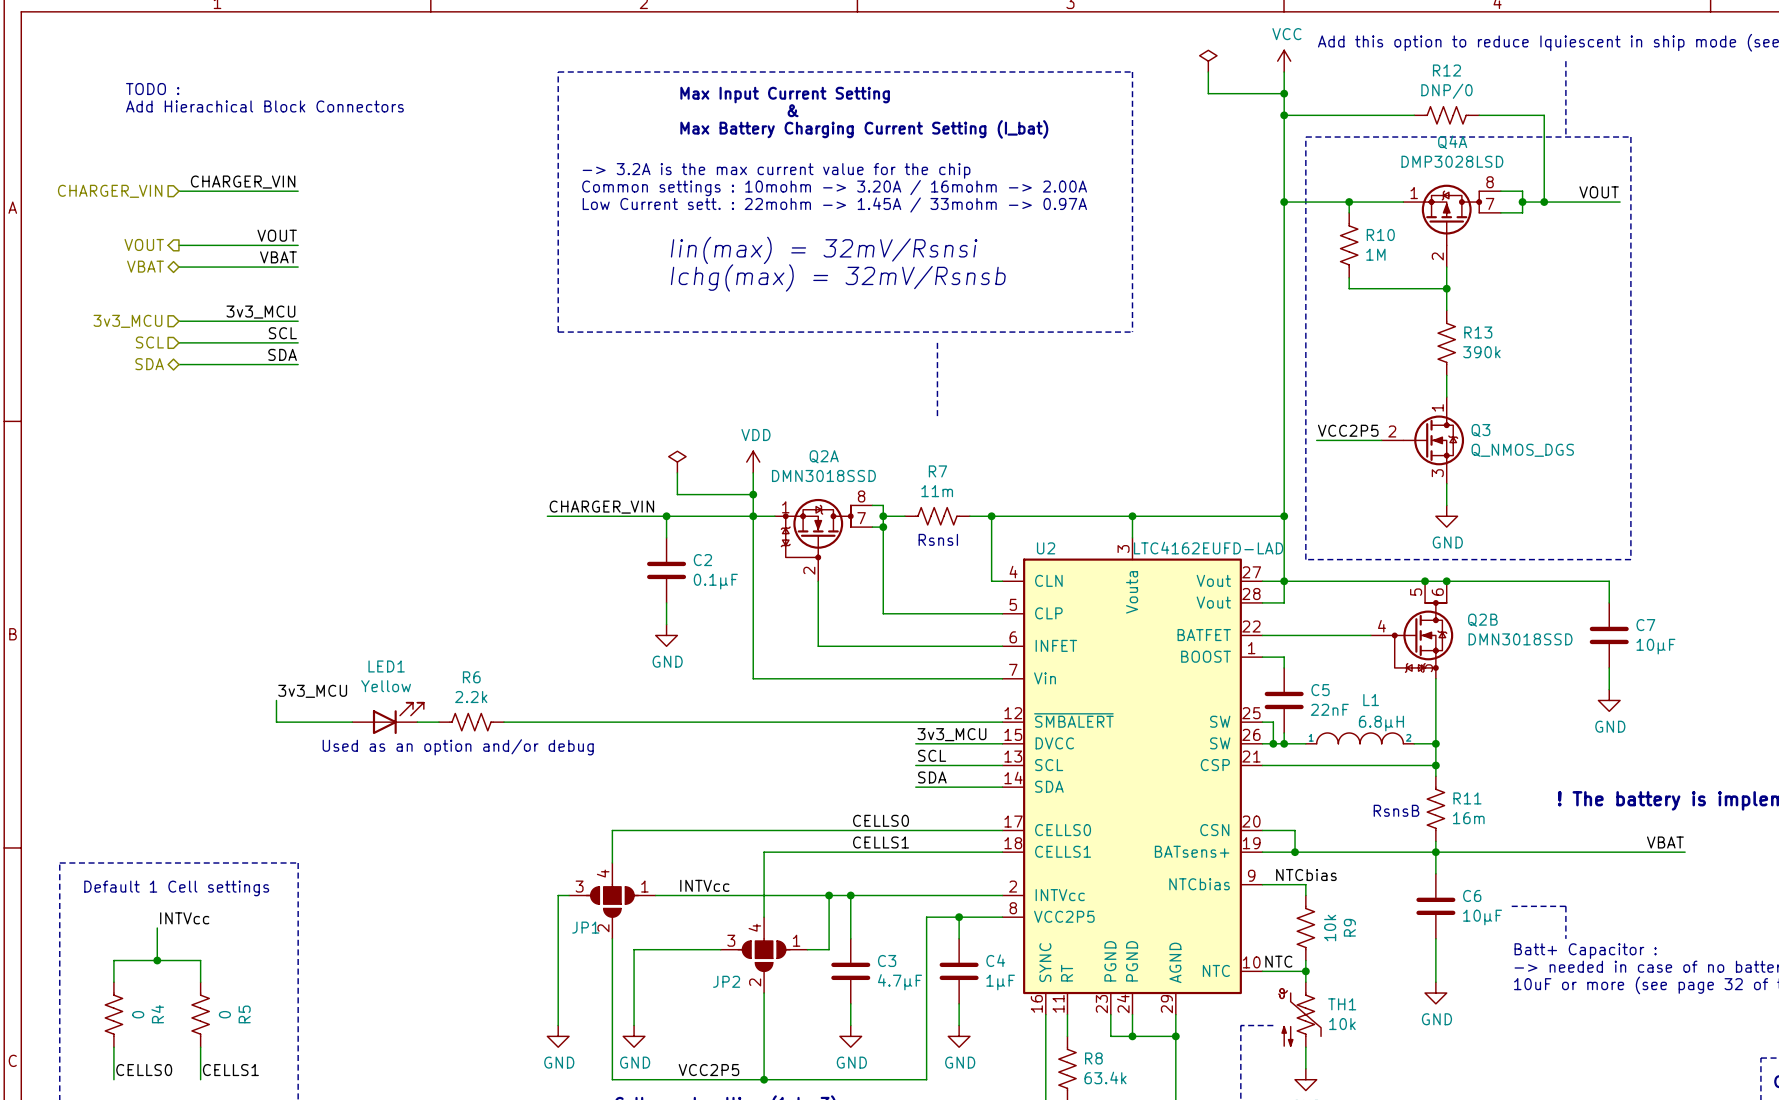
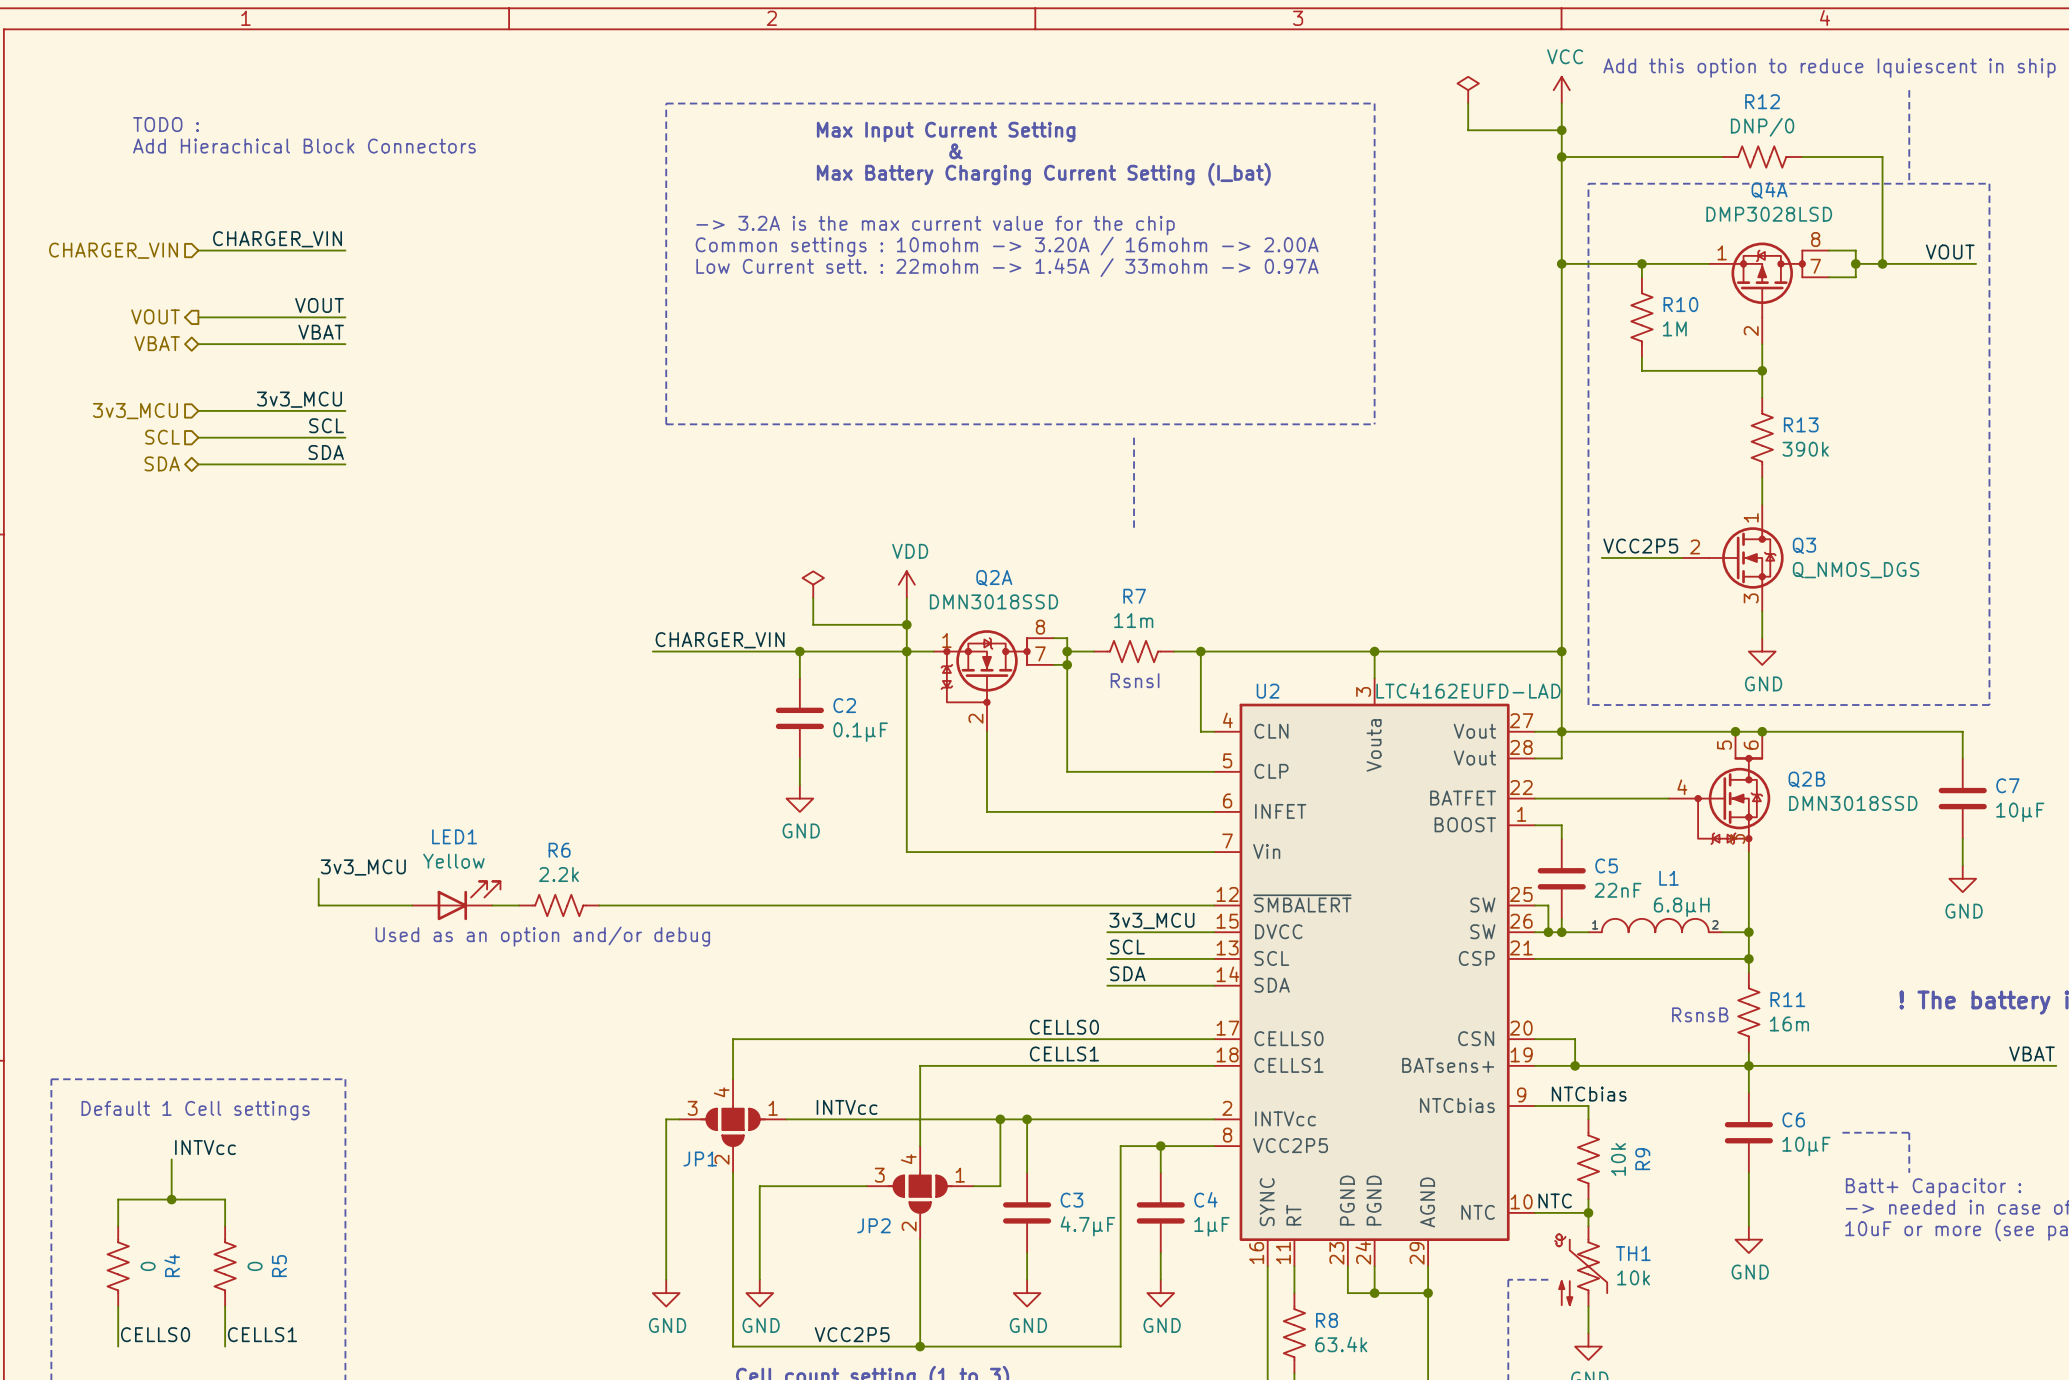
text: Iin(max) = 32mV/Rsnsi (824, 250) -> none
text: Ichg(max) = 32mV/Rsnsb (838, 277) -> none

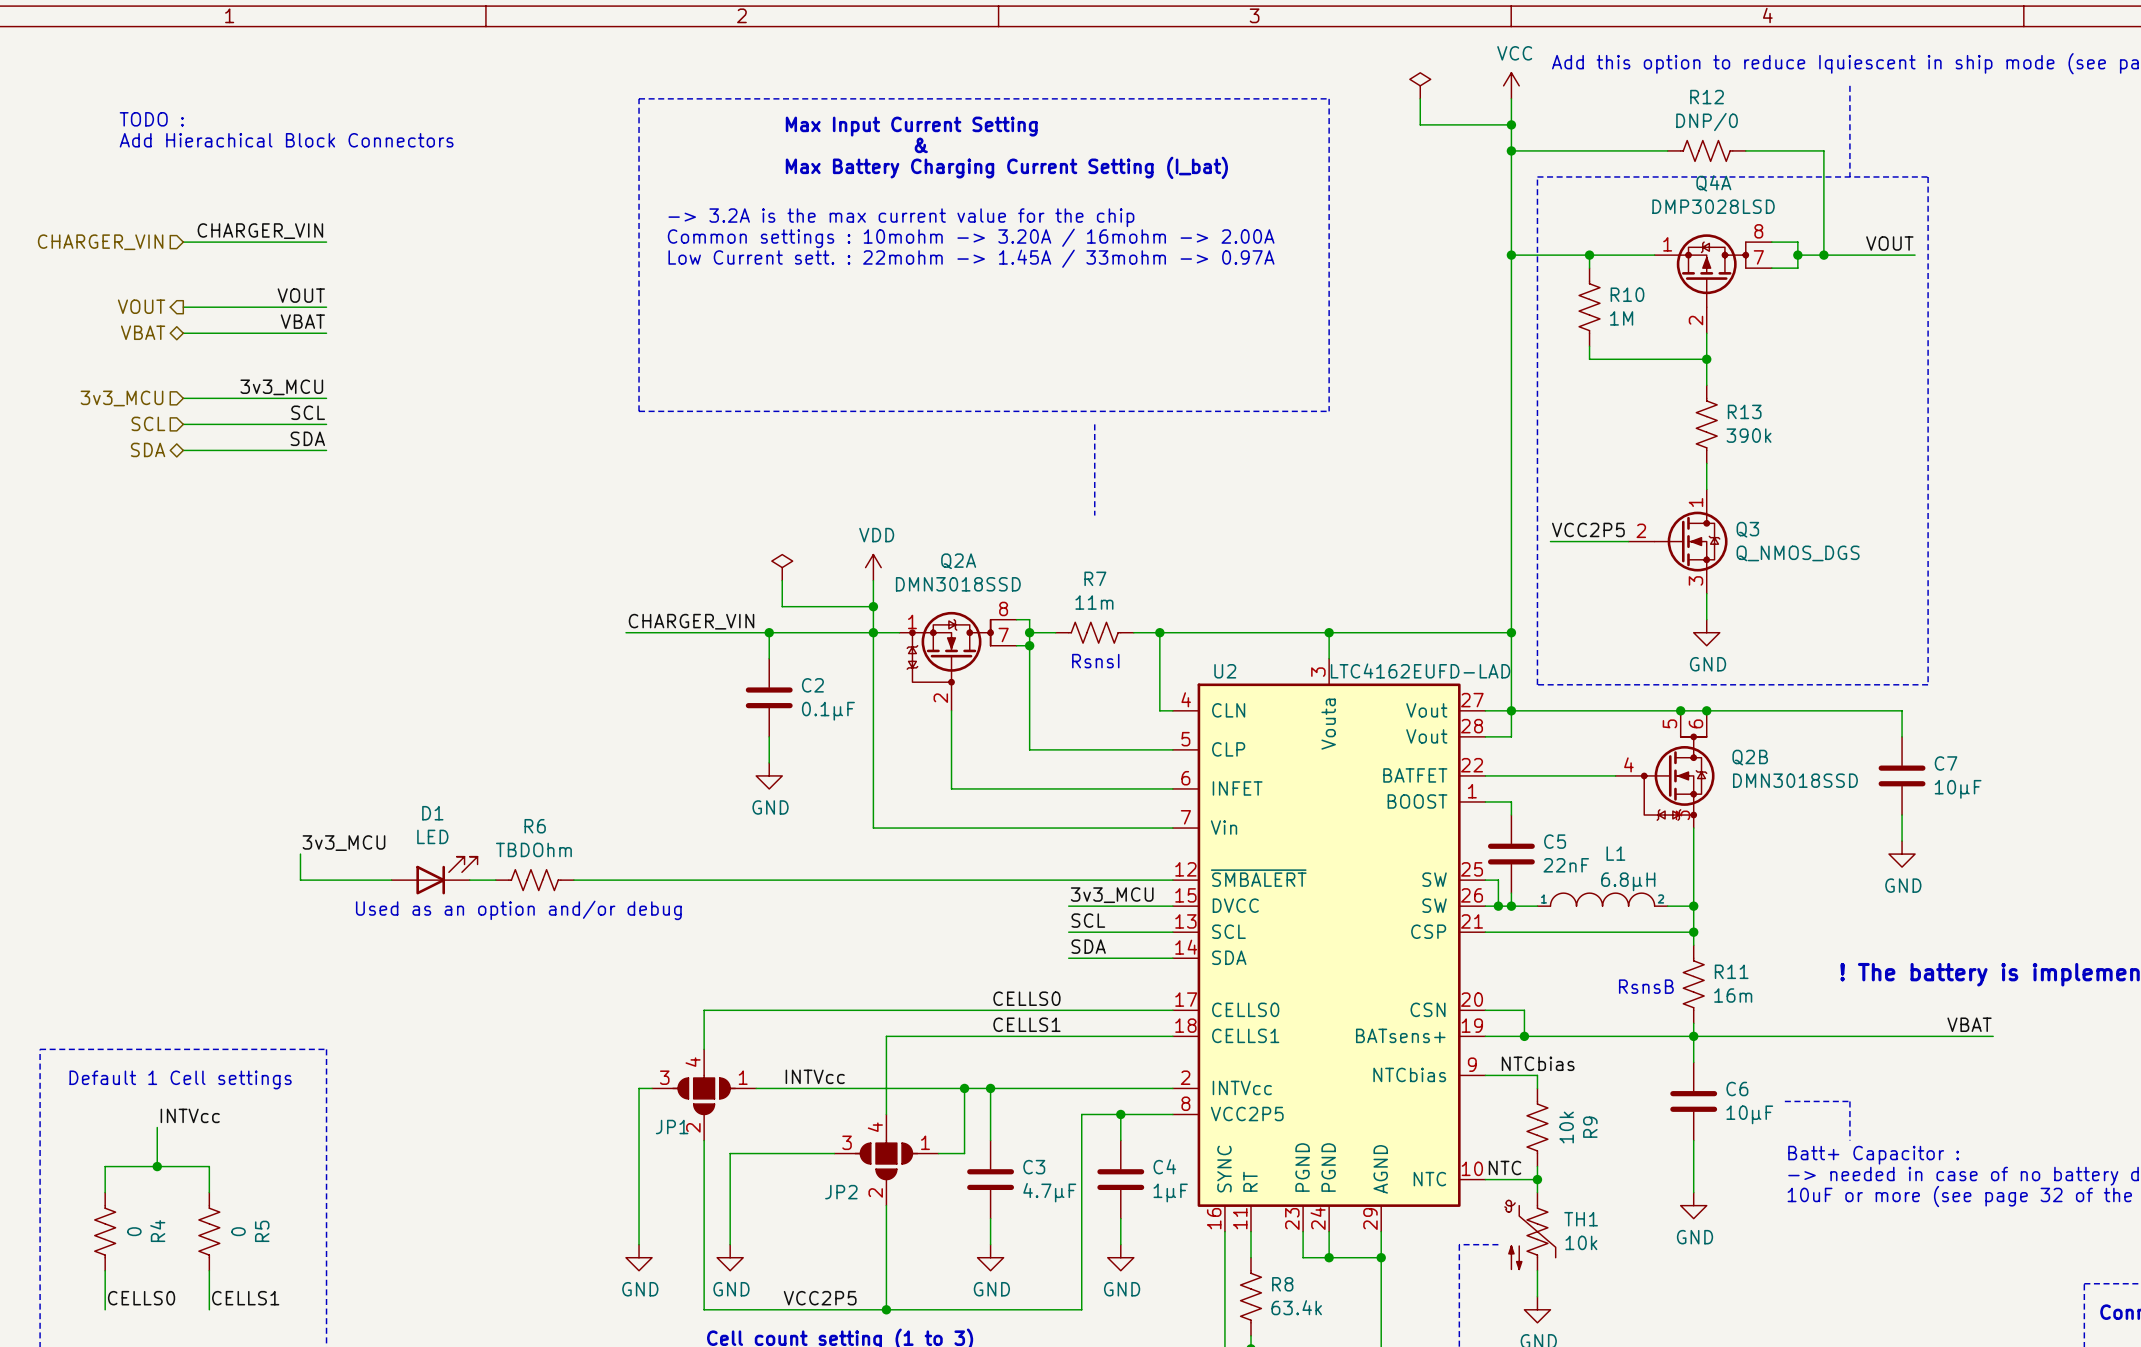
LED1 name: LED1 (454, 836) -> D1 (432, 813)
LED1 text: Yellow (453, 861) -> none
LED1 value: none -> LED (432, 836)
R6 value: 2.2k (558, 874) -> TBDOhm (533, 849)

